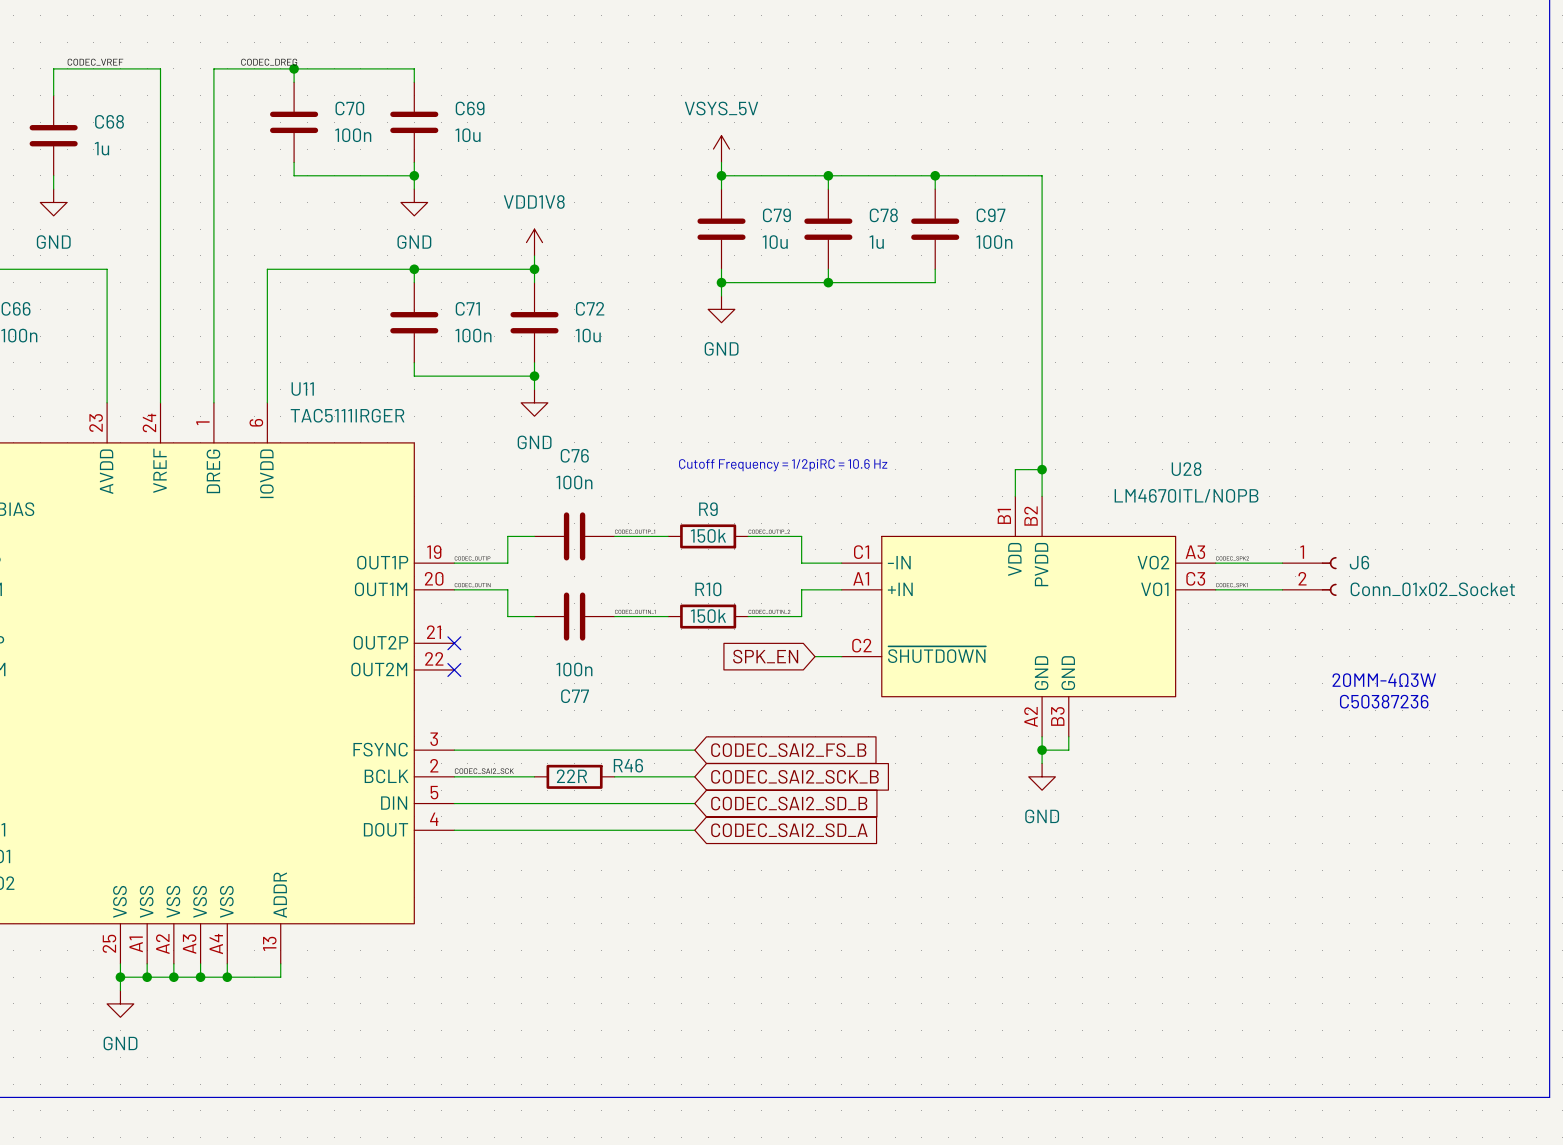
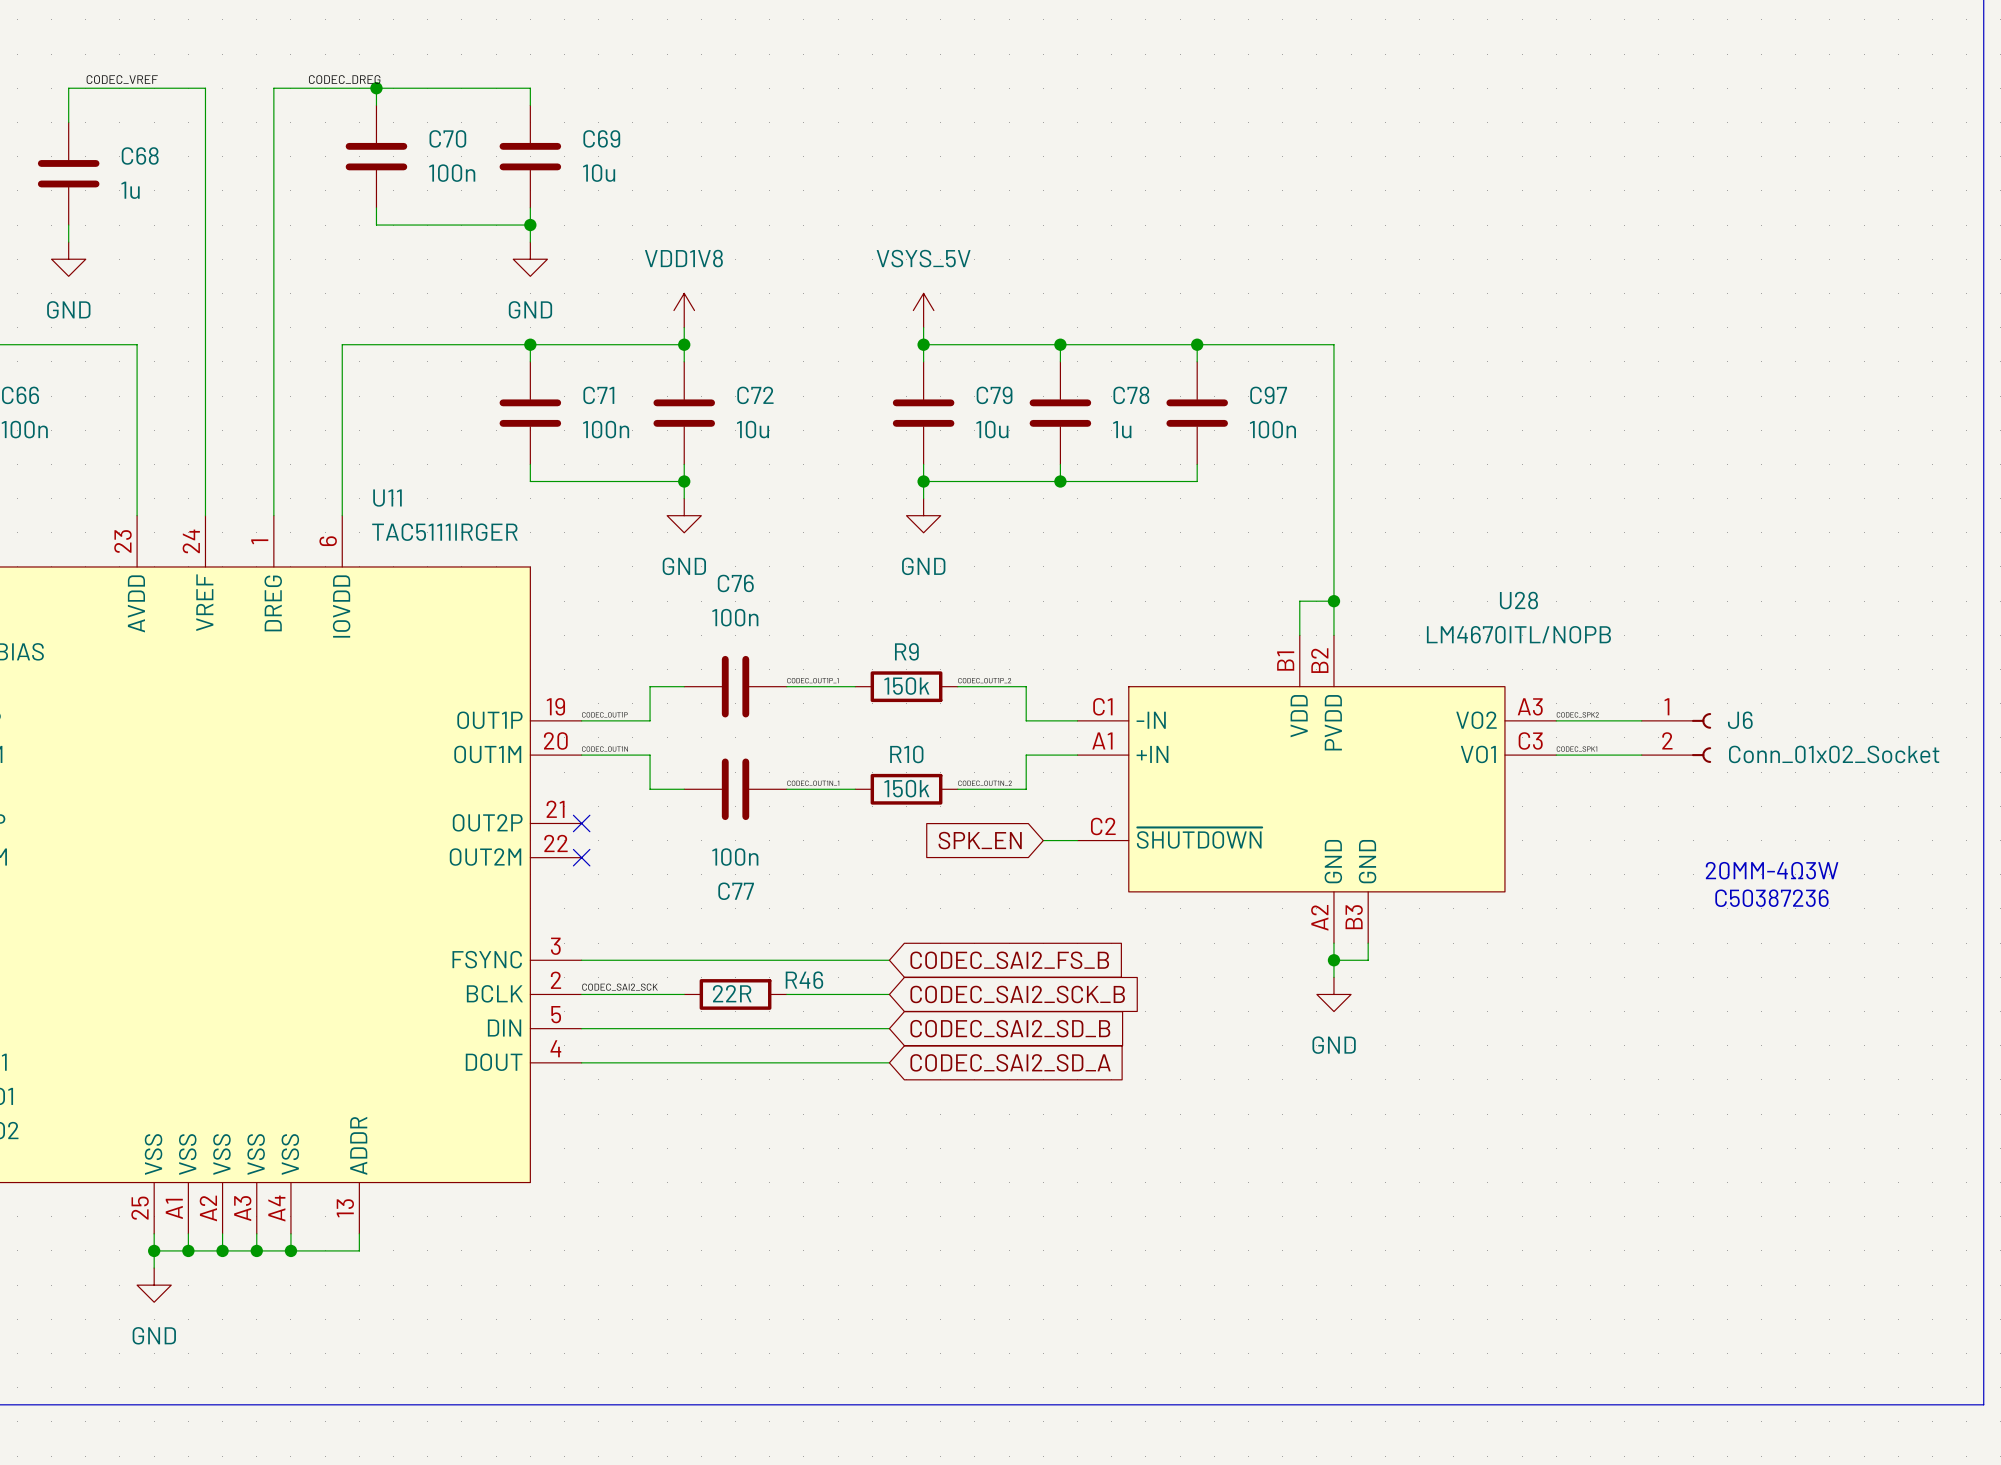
power symbol position: VSYS_5V (721, 149) -> VSYS_5V (923, 310)
wire: (721, 162) (721, 189) -> (923, 464) (923, 498)
wire: (721, 175) (1042, 175) (1042, 269) -> (923, 327) (923, 344) (1333, 344)
junction: (721, 175) -> none
wire: (828, 175) (828, 189) -> (1060, 464) (1060, 481)
junction: (828, 175) -> none
wire: (935, 175) (935, 189) -> none
junction: (935, 175) -> none
C79 position: (721, 229) -> (923, 413)
C78 position: (828, 229) -> (1060, 413)
C97 position: (935, 229) -> (1197, 413)
junction: none -> (1197, 344)
junction position: (721, 282) -> (923, 344)
junction position: (828, 282) -> (1060, 344)
wire: (935, 282) (721, 282) (721, 295) -> none
power symbol position: GND (721, 309) -> GND (923, 515)
wire: none -> (1197, 464) (1197, 481) (923, 481)
junction: none -> (923, 481)
junction: none -> (1060, 481)
text: Cutoff Frequency = 1/2piRC = 10.6 Hz (783, 465) -> none

